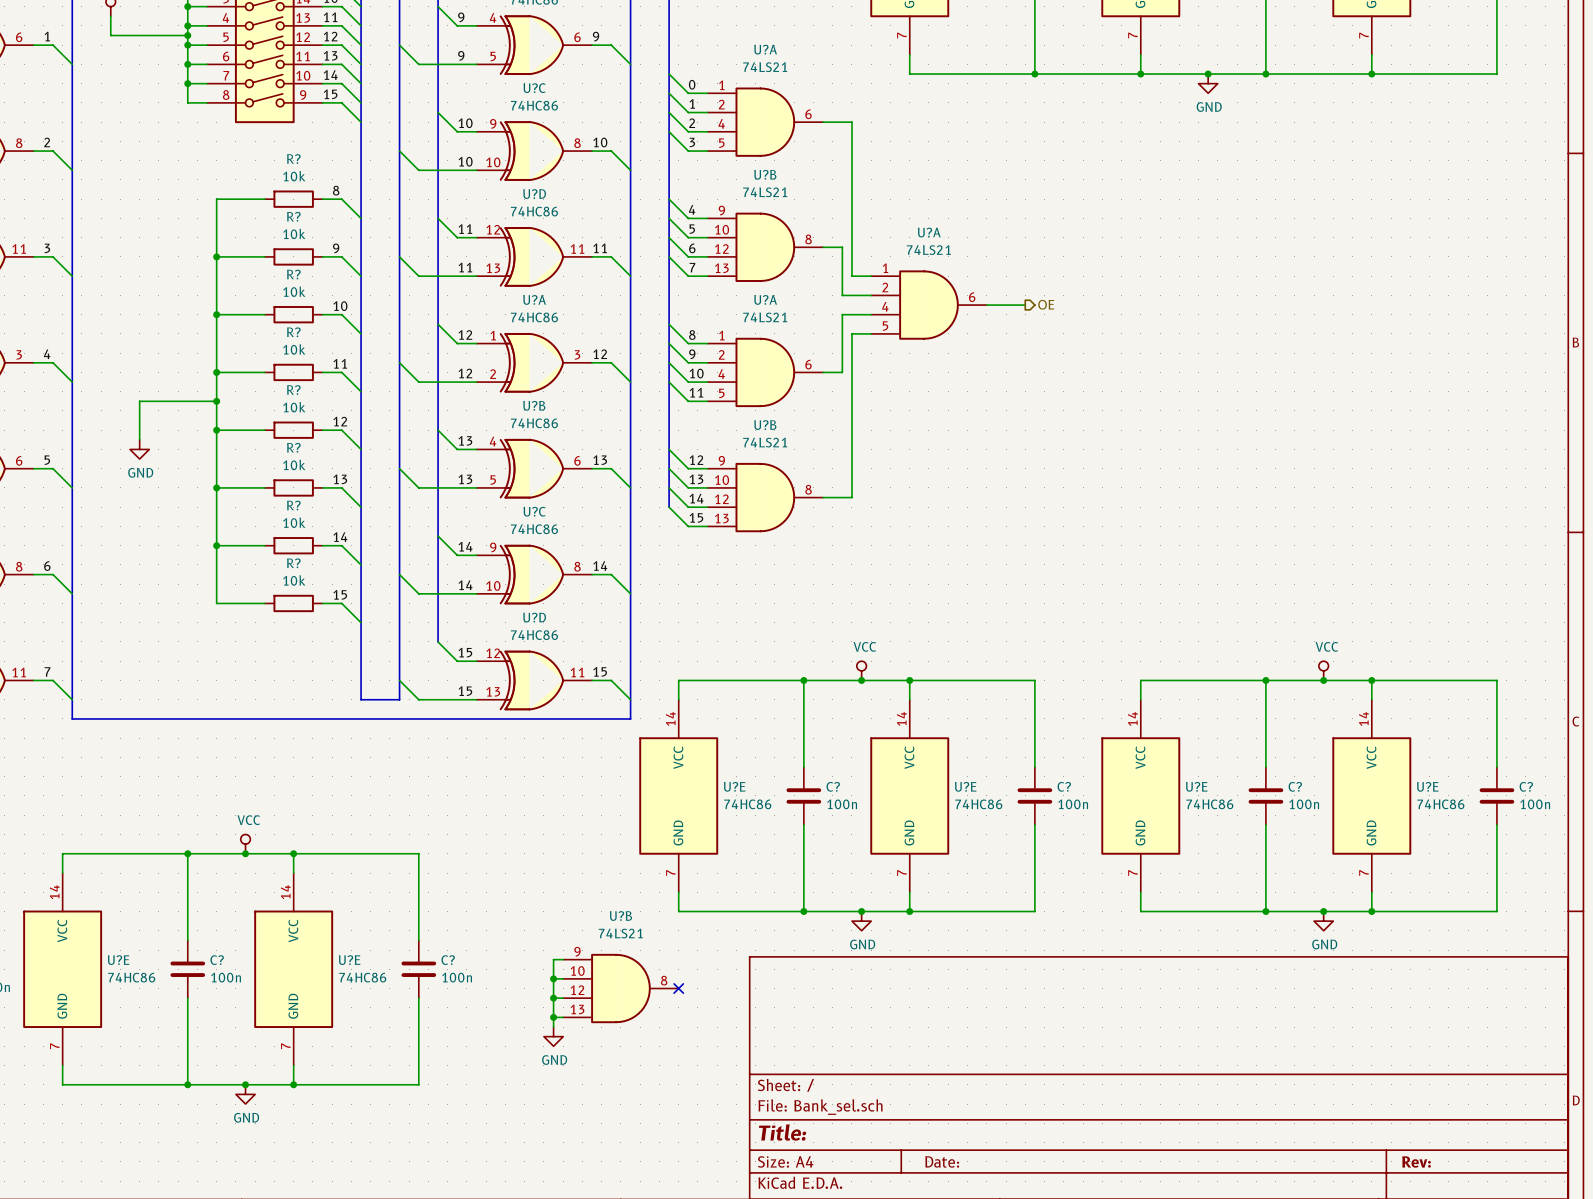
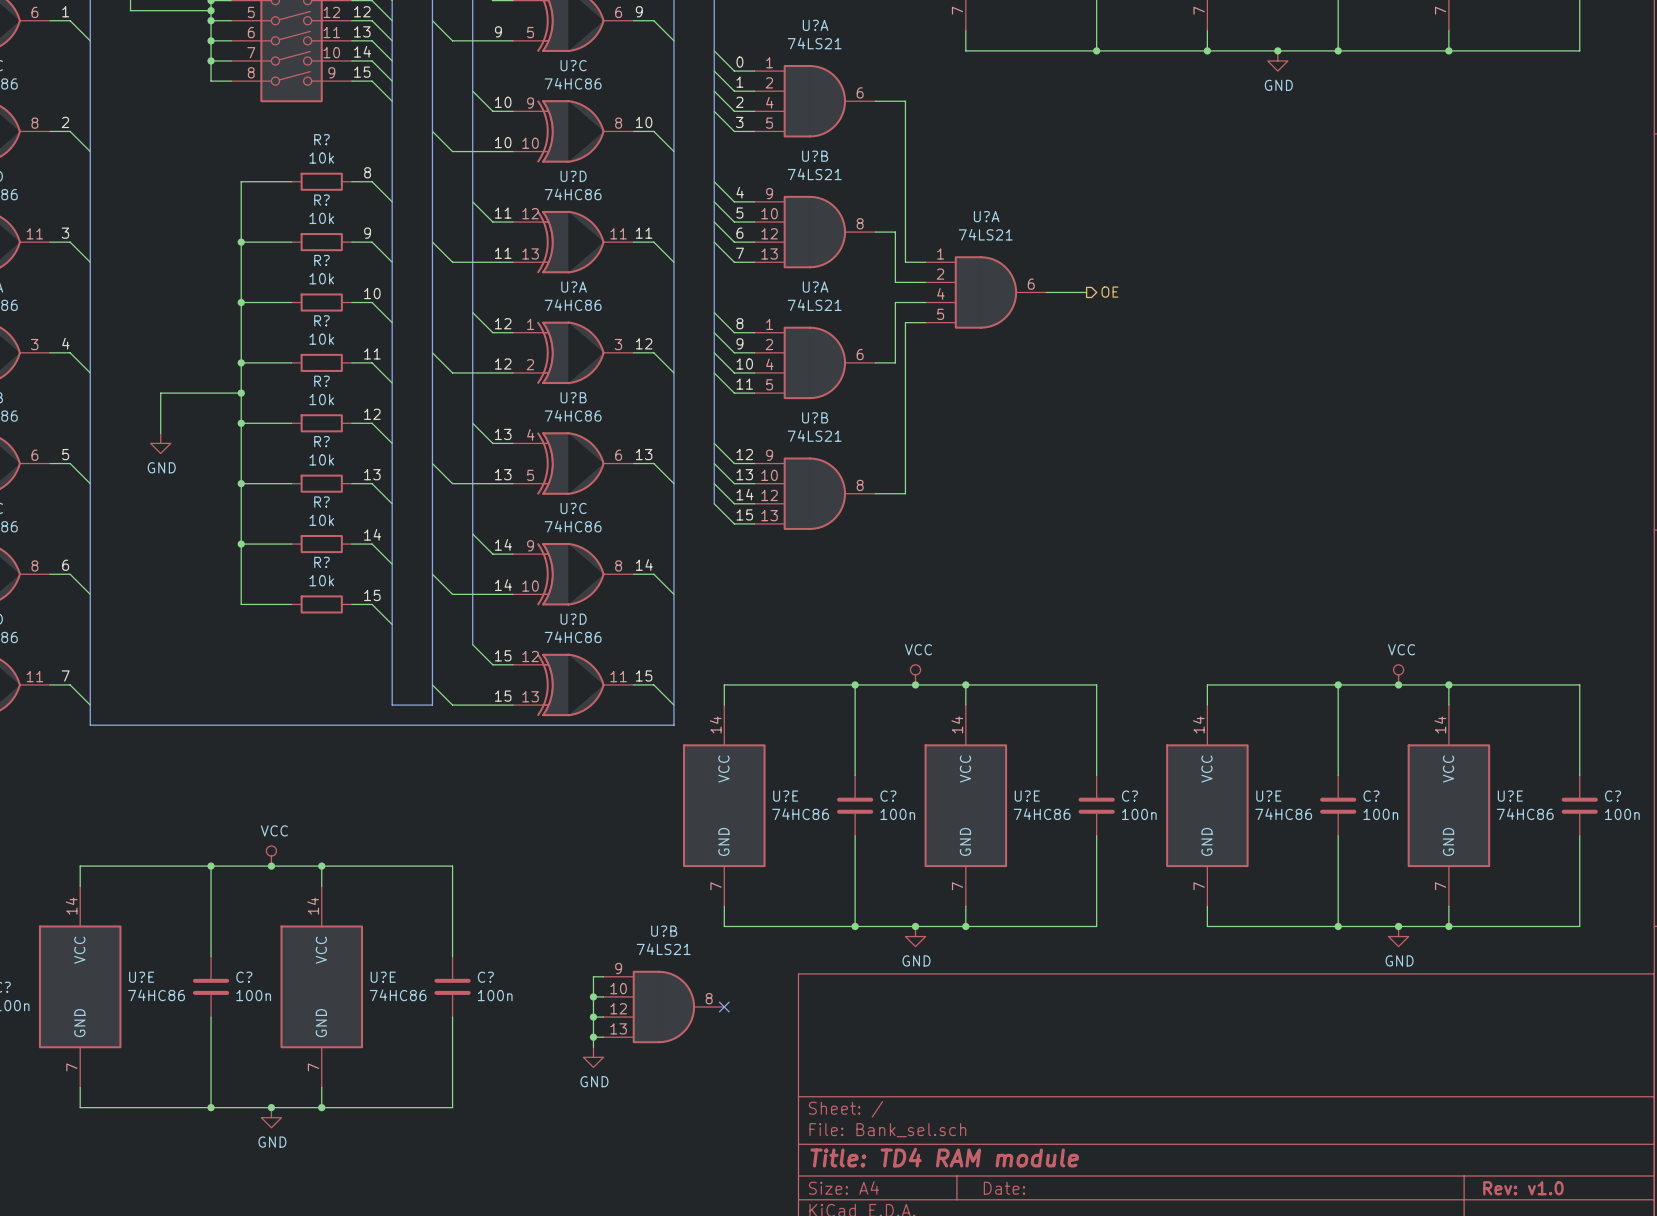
title block: Title: (782, 1132) -> Title: TD4 RAM module (944, 1157)
title block: Rev: (1416, 1162) -> Rev: v1.0 (1523, 1188)

